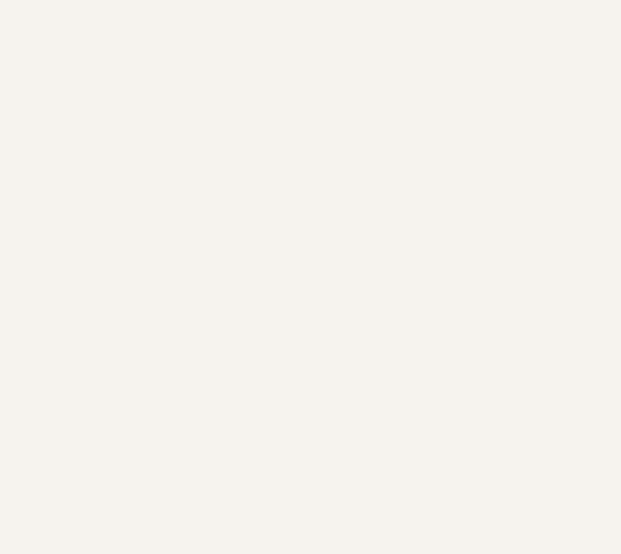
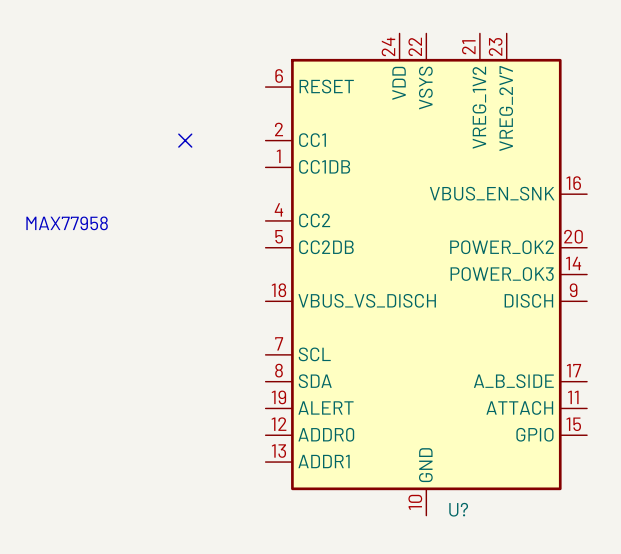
no-connect mark: none -> (185, 140)
text: none -> MAX77958 (67, 223)
U?: none -> (426, 274)

